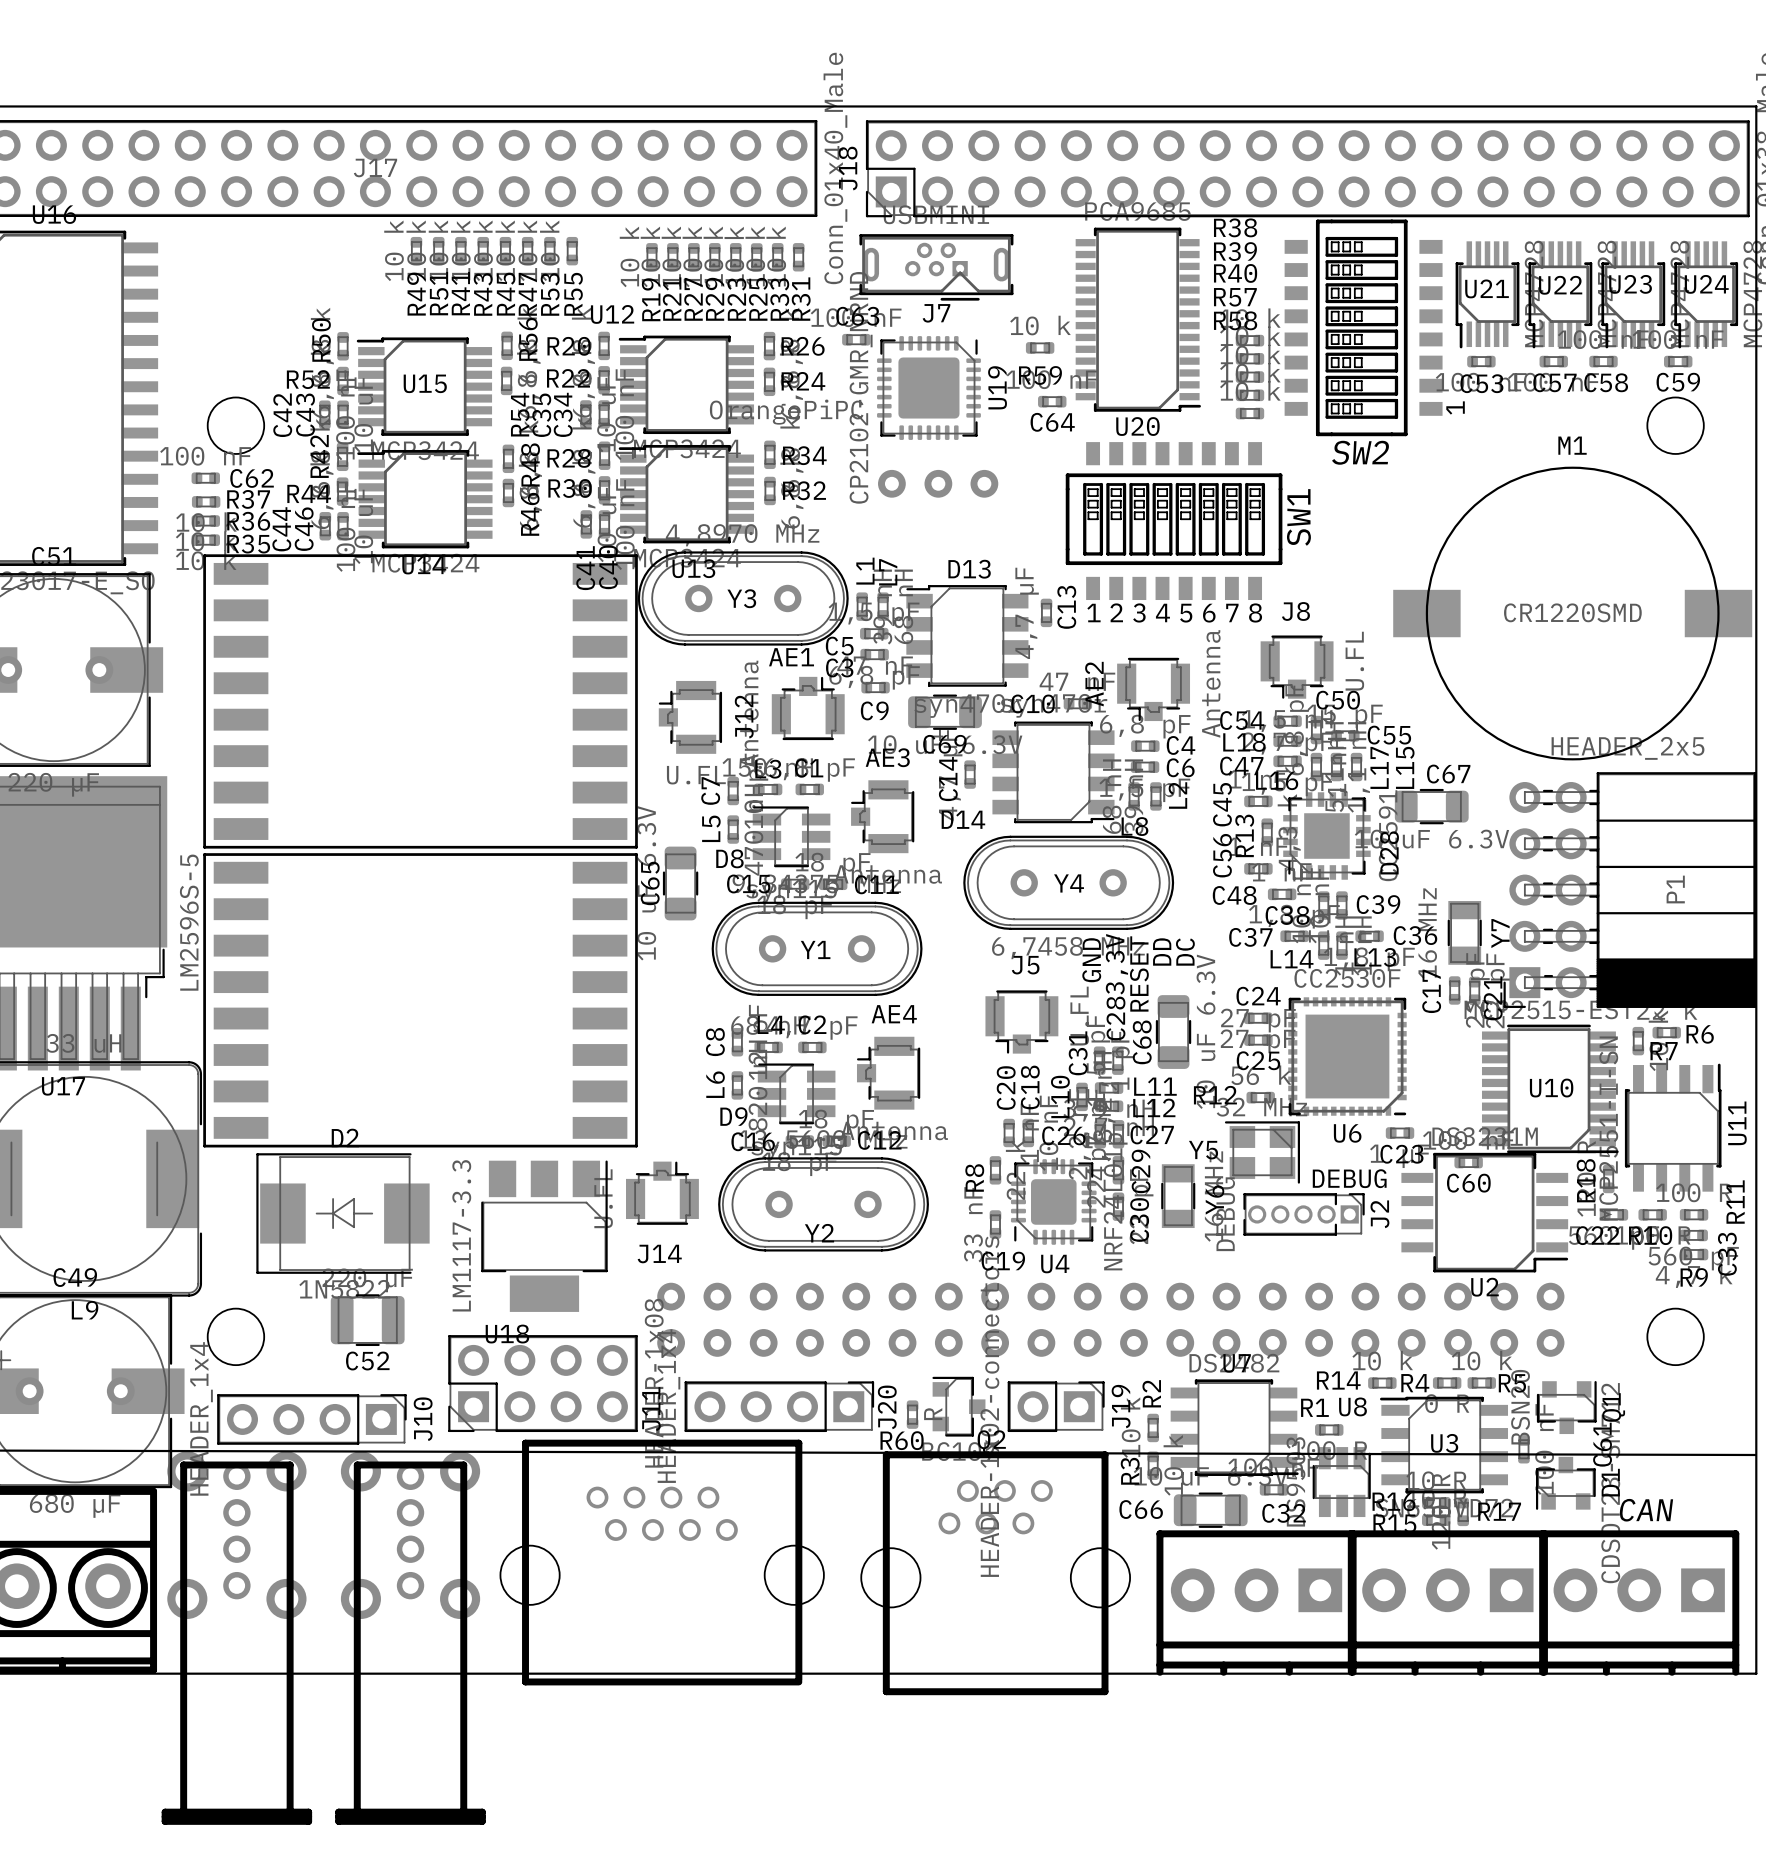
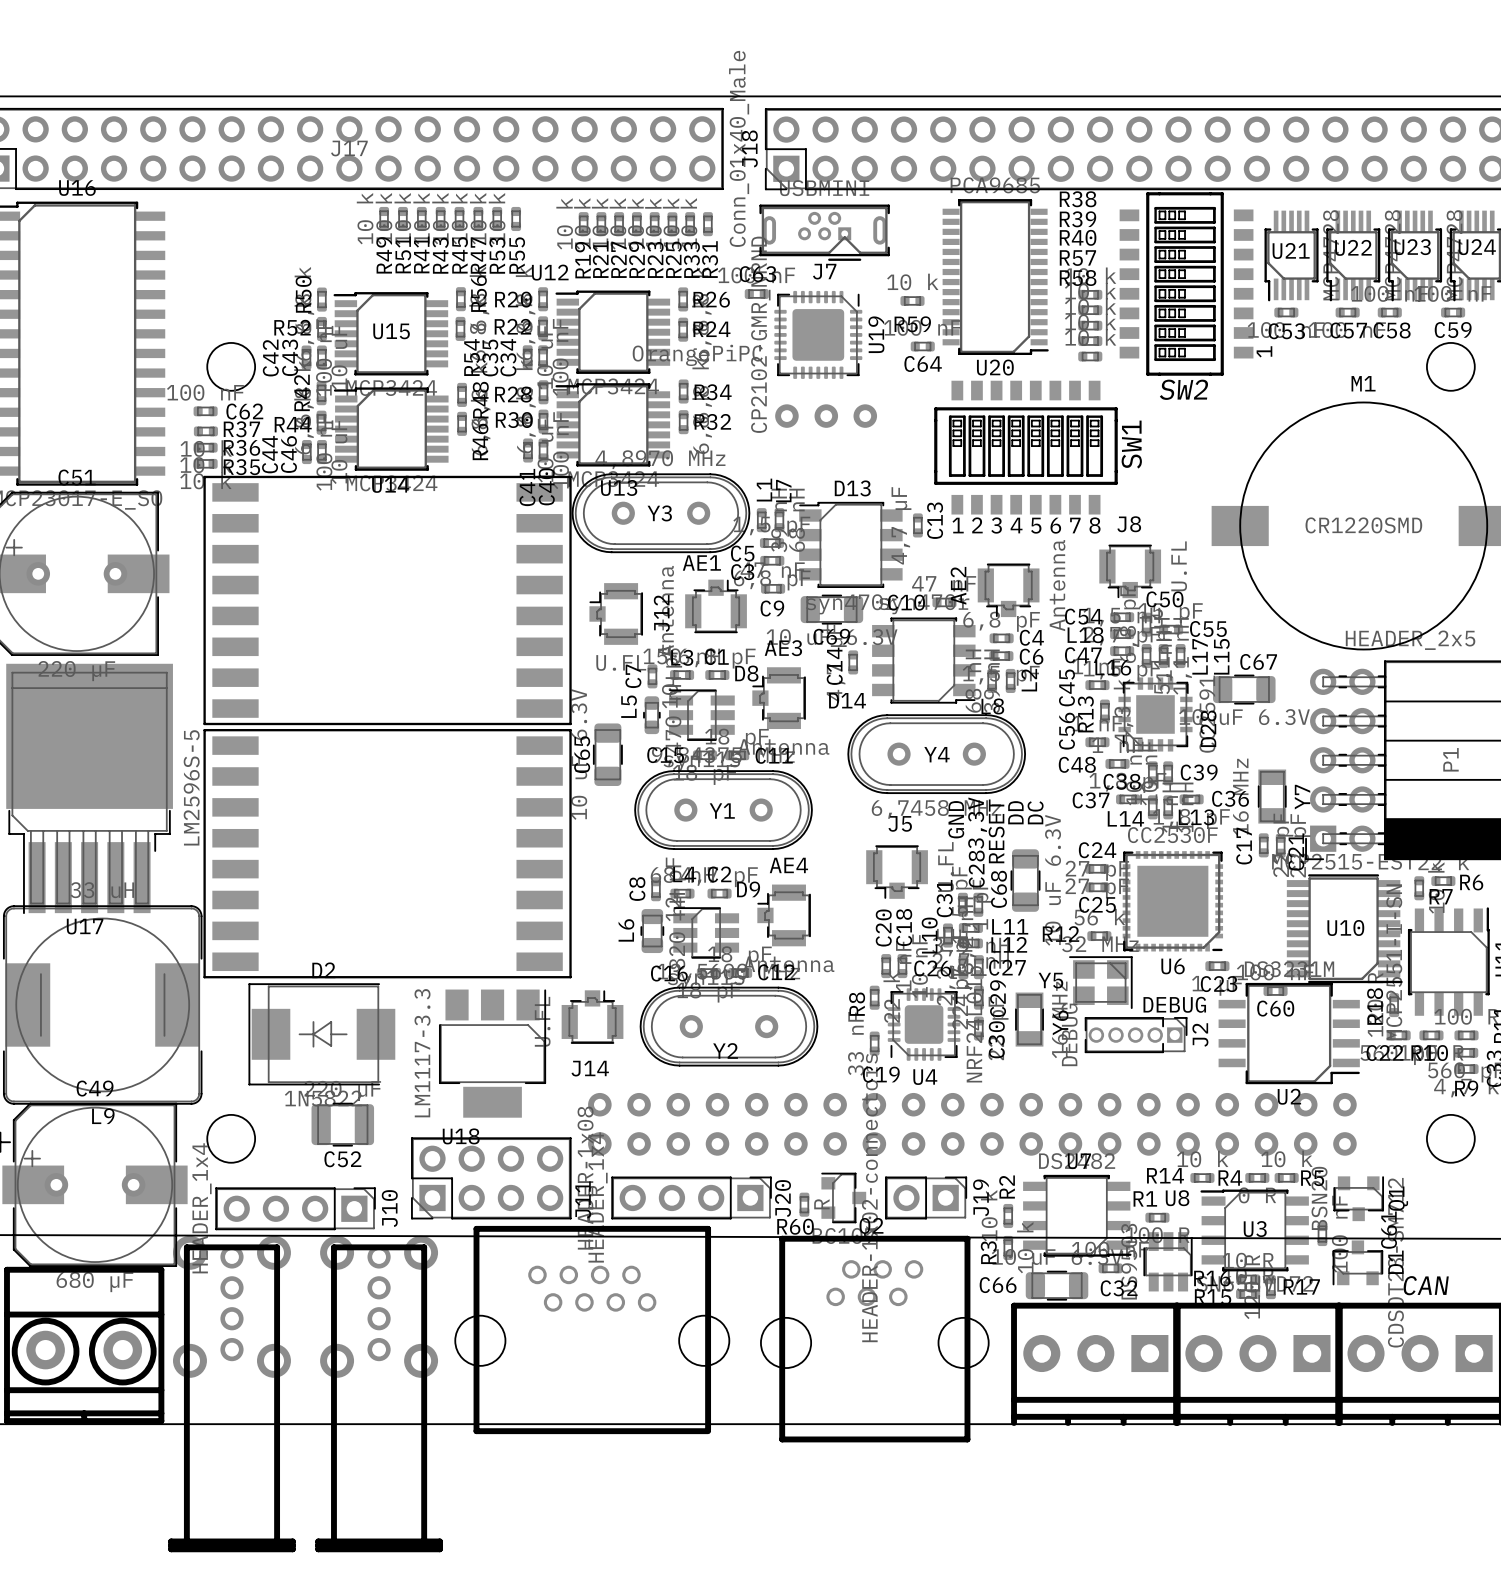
L5 footprint: [727, 815, 740, 844] -> [643, 696, 661, 735]
D8 name position: D8 (729, 858) -> D8 (746, 673)
L6 footprint: [731, 1071, 744, 1100] -> [640, 909, 665, 954]
D9 name position: D9 (733, 1116) -> D9 (748, 889)

